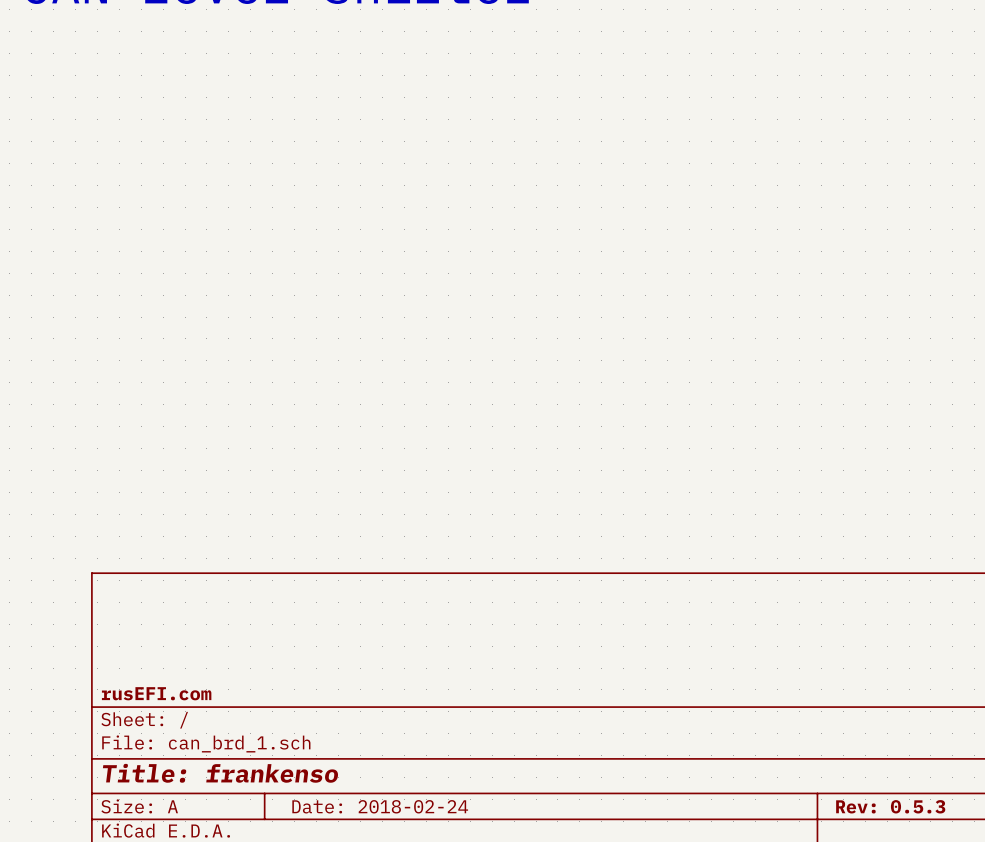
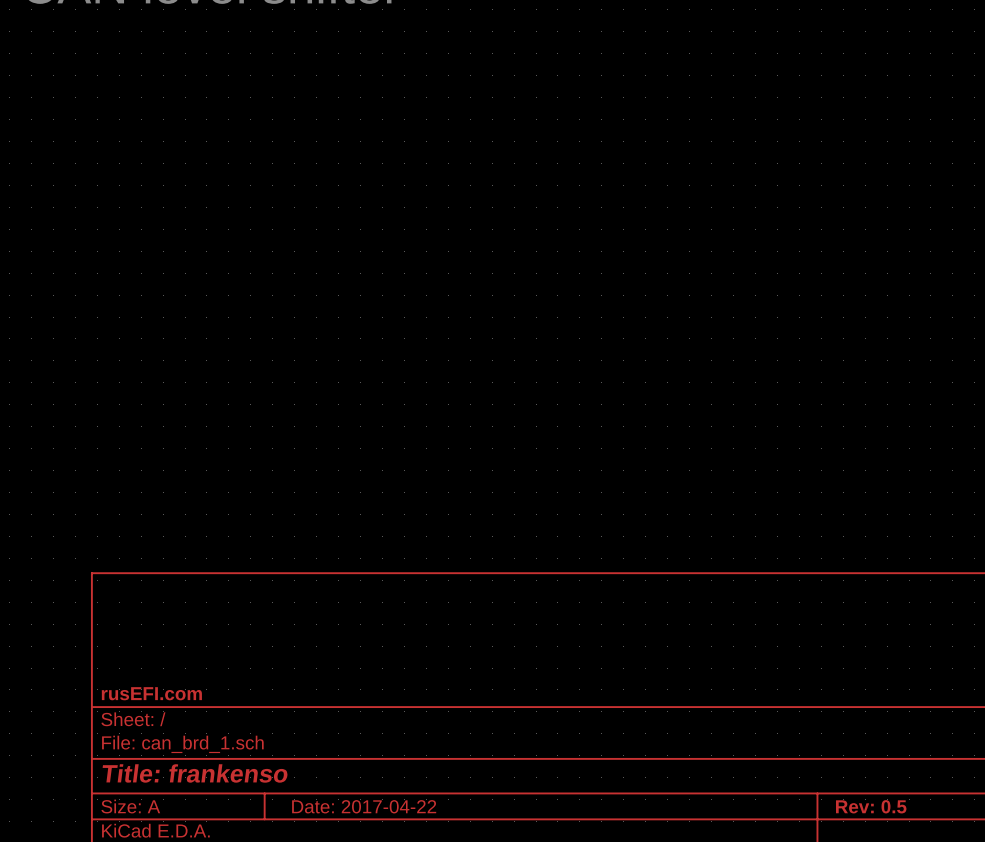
title block: Date: 2018-02-24 (380, 806) -> Date: 2017-04-22 (364, 806)
title block: Rev: 0.5.3 (890, 806) -> Rev: 0.5 (871, 806)

